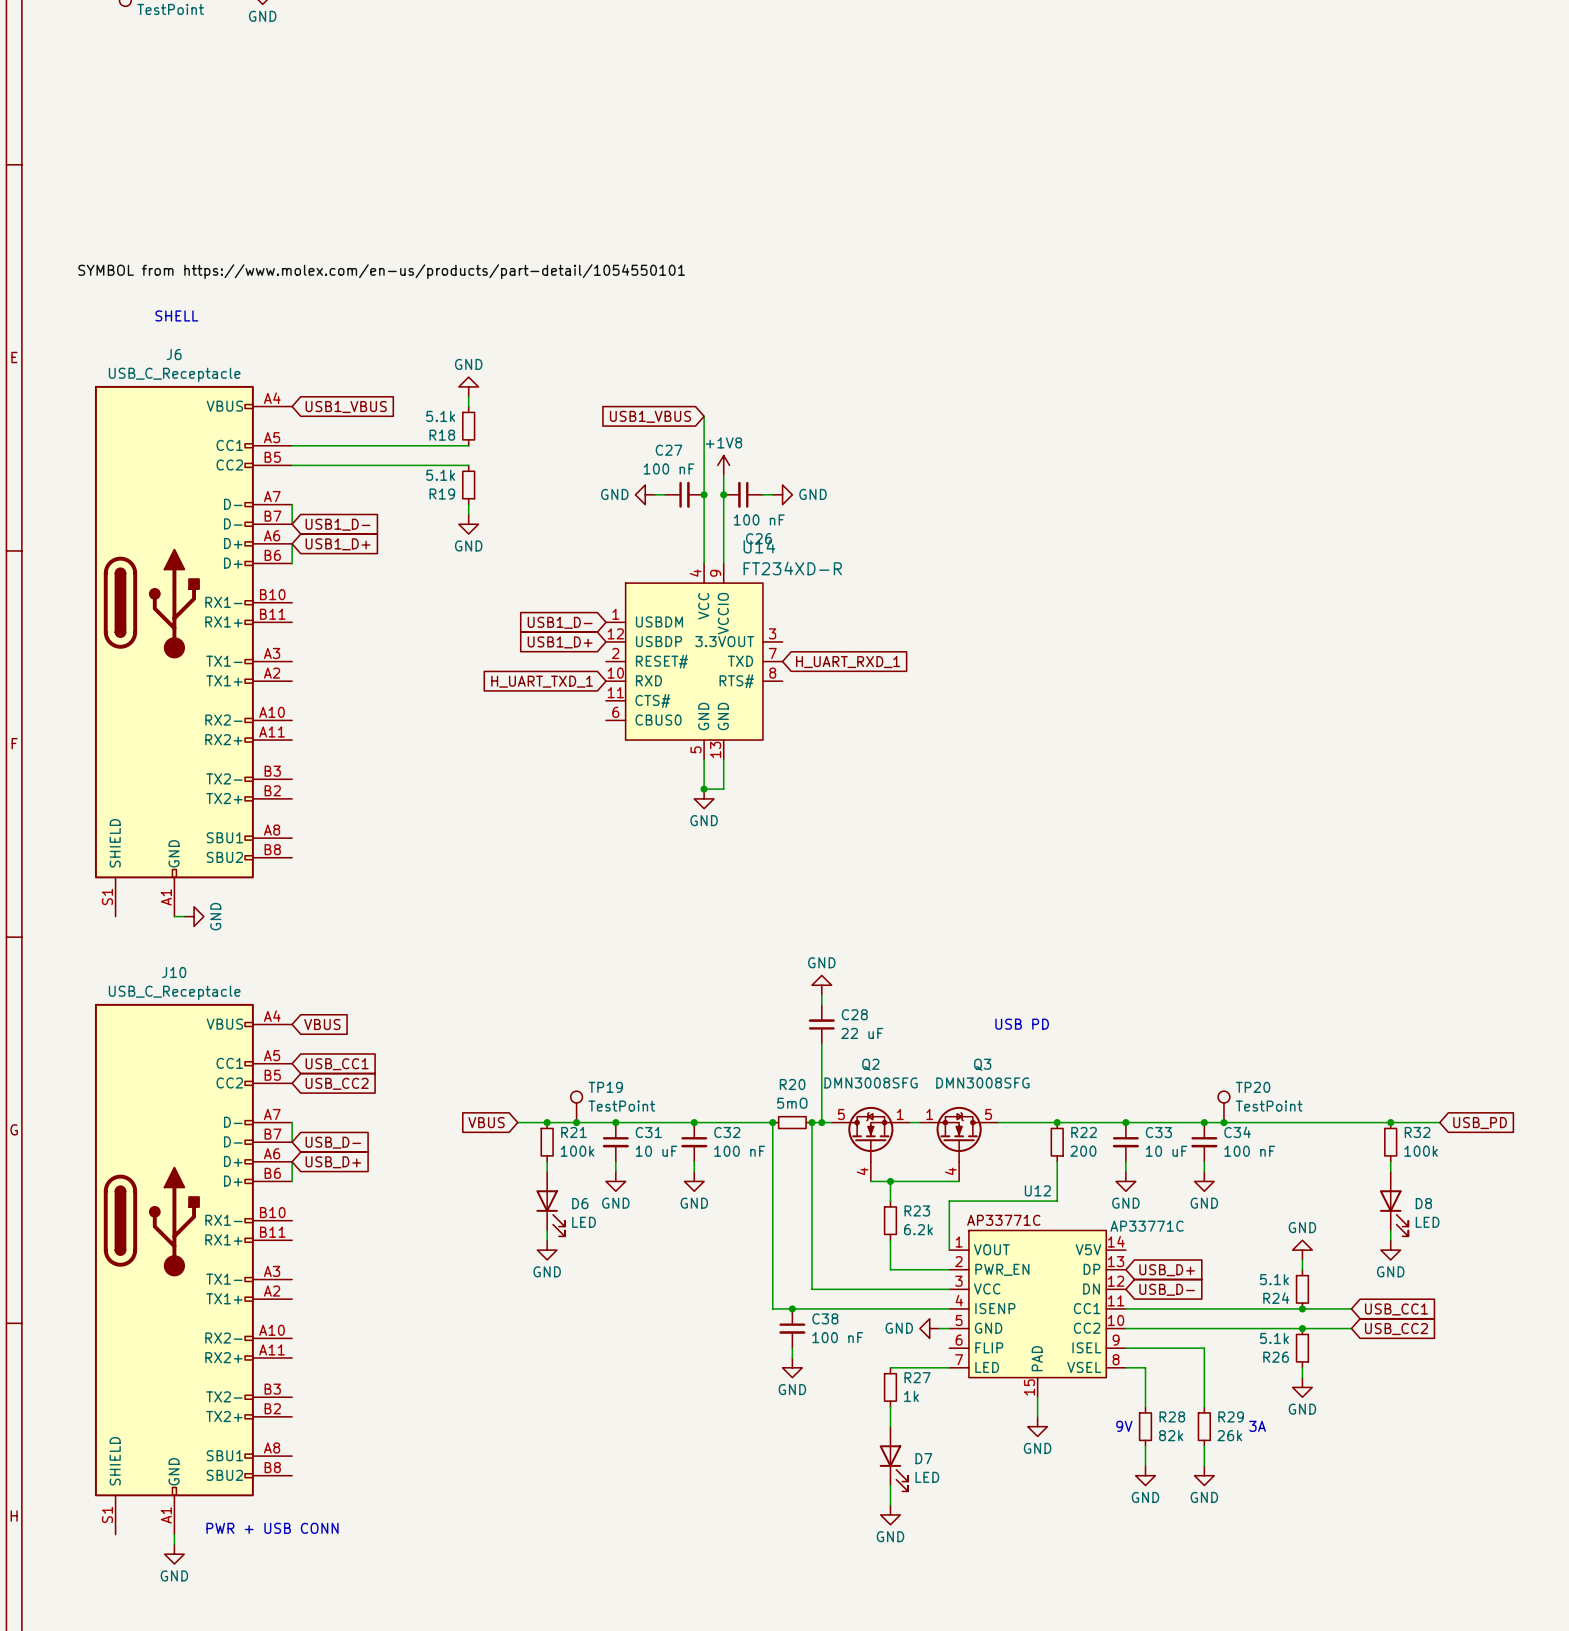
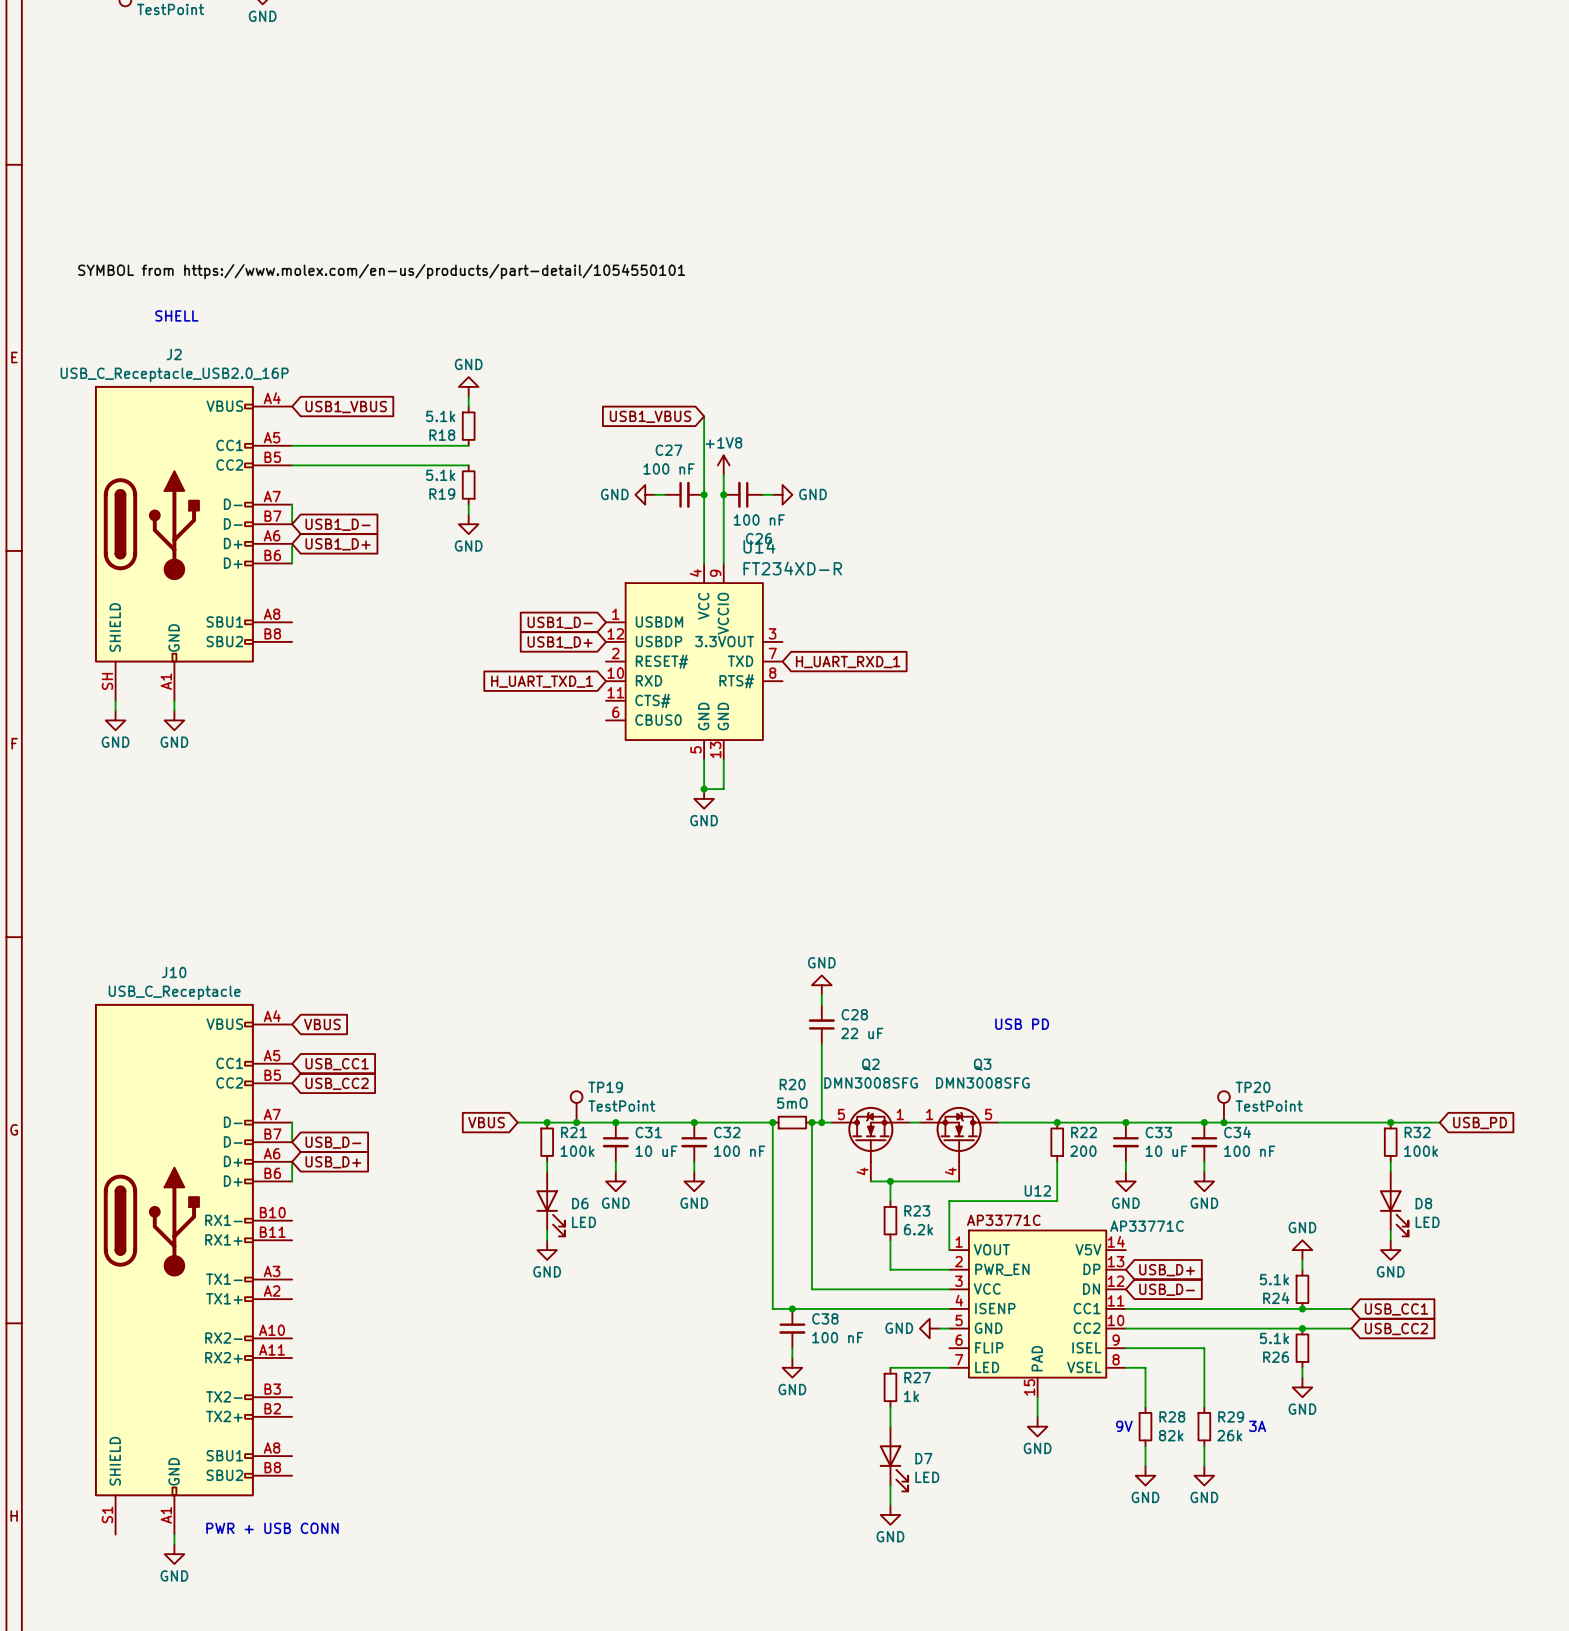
J2: none -> USB_C_Receptacle_USB2.0_16P (193, 543)
J6: USB_C_Receptacle (193, 651) -> none
power symbol: none -> GND (115, 720)
power symbol: none -> GND (174, 720)
wire: (174, 916) (184, 916) -> none
power symbol: GND (194, 916) -> none

